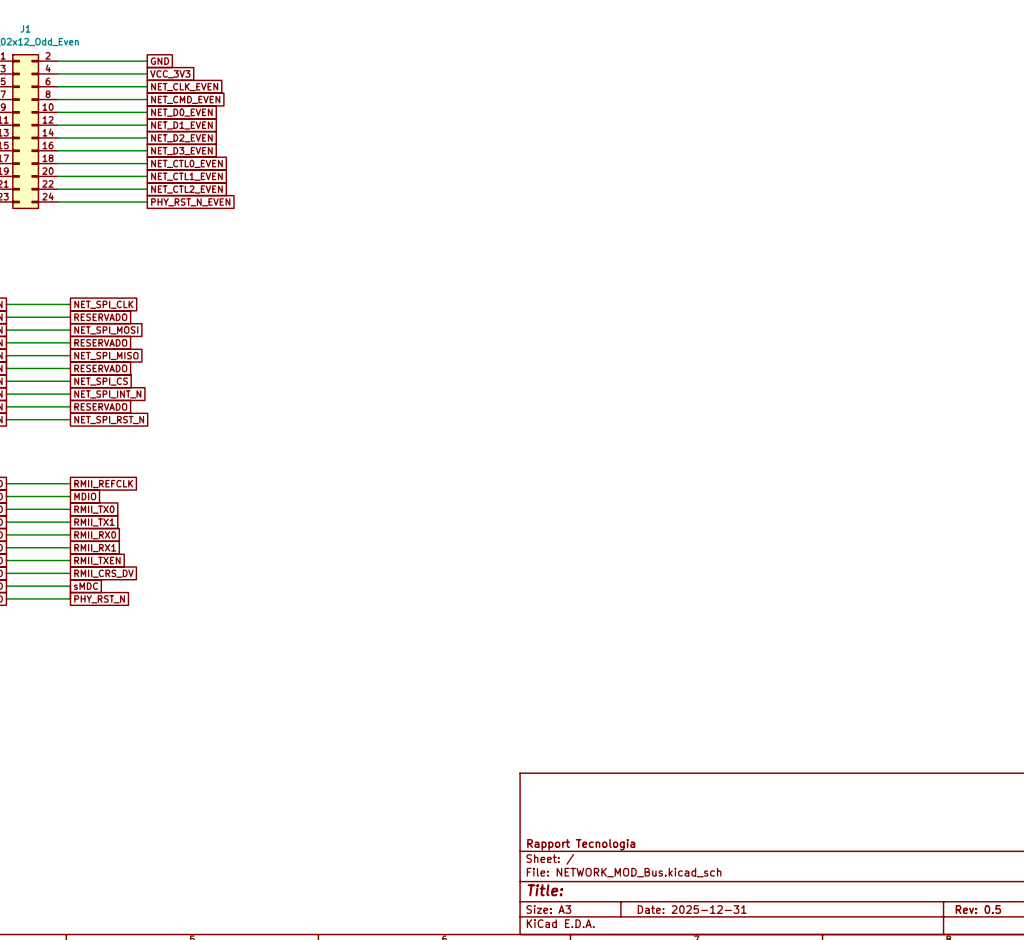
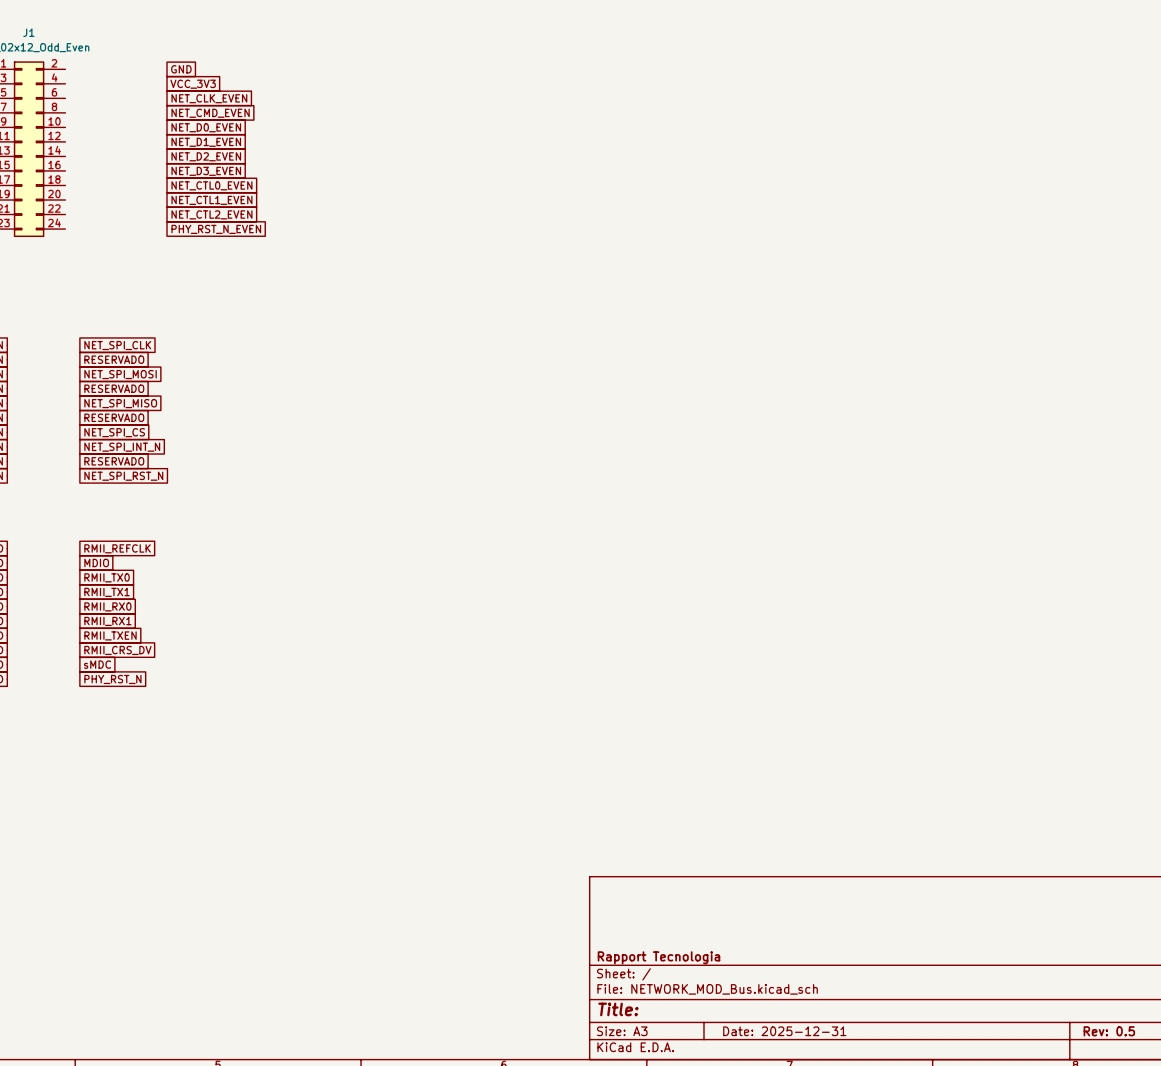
wire: (57, 61) (147, 61) -> none
wire: (57, 73) (147, 73) -> none
wire: (57, 86) (147, 86) -> none
wire: (57, 99) (147, 99) -> none
wire: (57, 112) (147, 112) -> none
wire: (57, 125) (147, 125) -> none
wire: (57, 137) (147, 137) -> none
wire: (57, 150) (147, 150) -> none
wire: (57, 163) (147, 163) -> none
wire: (57, 176) (147, 176) -> none
wire: (57, 189) (147, 189) -> none
wire: (57, 202) (147, 202) -> none
wire: (6, 304) (70, 304) -> none
wire: (6, 317) (70, 317) -> none
wire: (6, 330) (70, 330) -> none
wire: (6, 342) (70, 342) -> none
wire: (70, 355) (6, 355) (6, 368) (70, 368) -> none
wire: (6, 381) (70, 381) -> none
wire: (6, 394) (70, 394) -> none
wire: (6, 406) (70, 406) -> none
wire: (6, 419) (70, 419) -> none
wire: (6, 483) (70, 483) -> none
wire: (6, 496) (70, 496) -> none
wire: (6, 509) (70, 509) -> none
wire: (6, 522) (70, 522) -> none
wire: (6, 534) (70, 534) -> none
wire: (6, 547) (70, 547) -> none
wire: (6, 560) (70, 560) -> none
wire: (6, 573) (70, 573) -> none
wire: (6, 586) (70, 586) (70, 598) (6, 598) -> none

